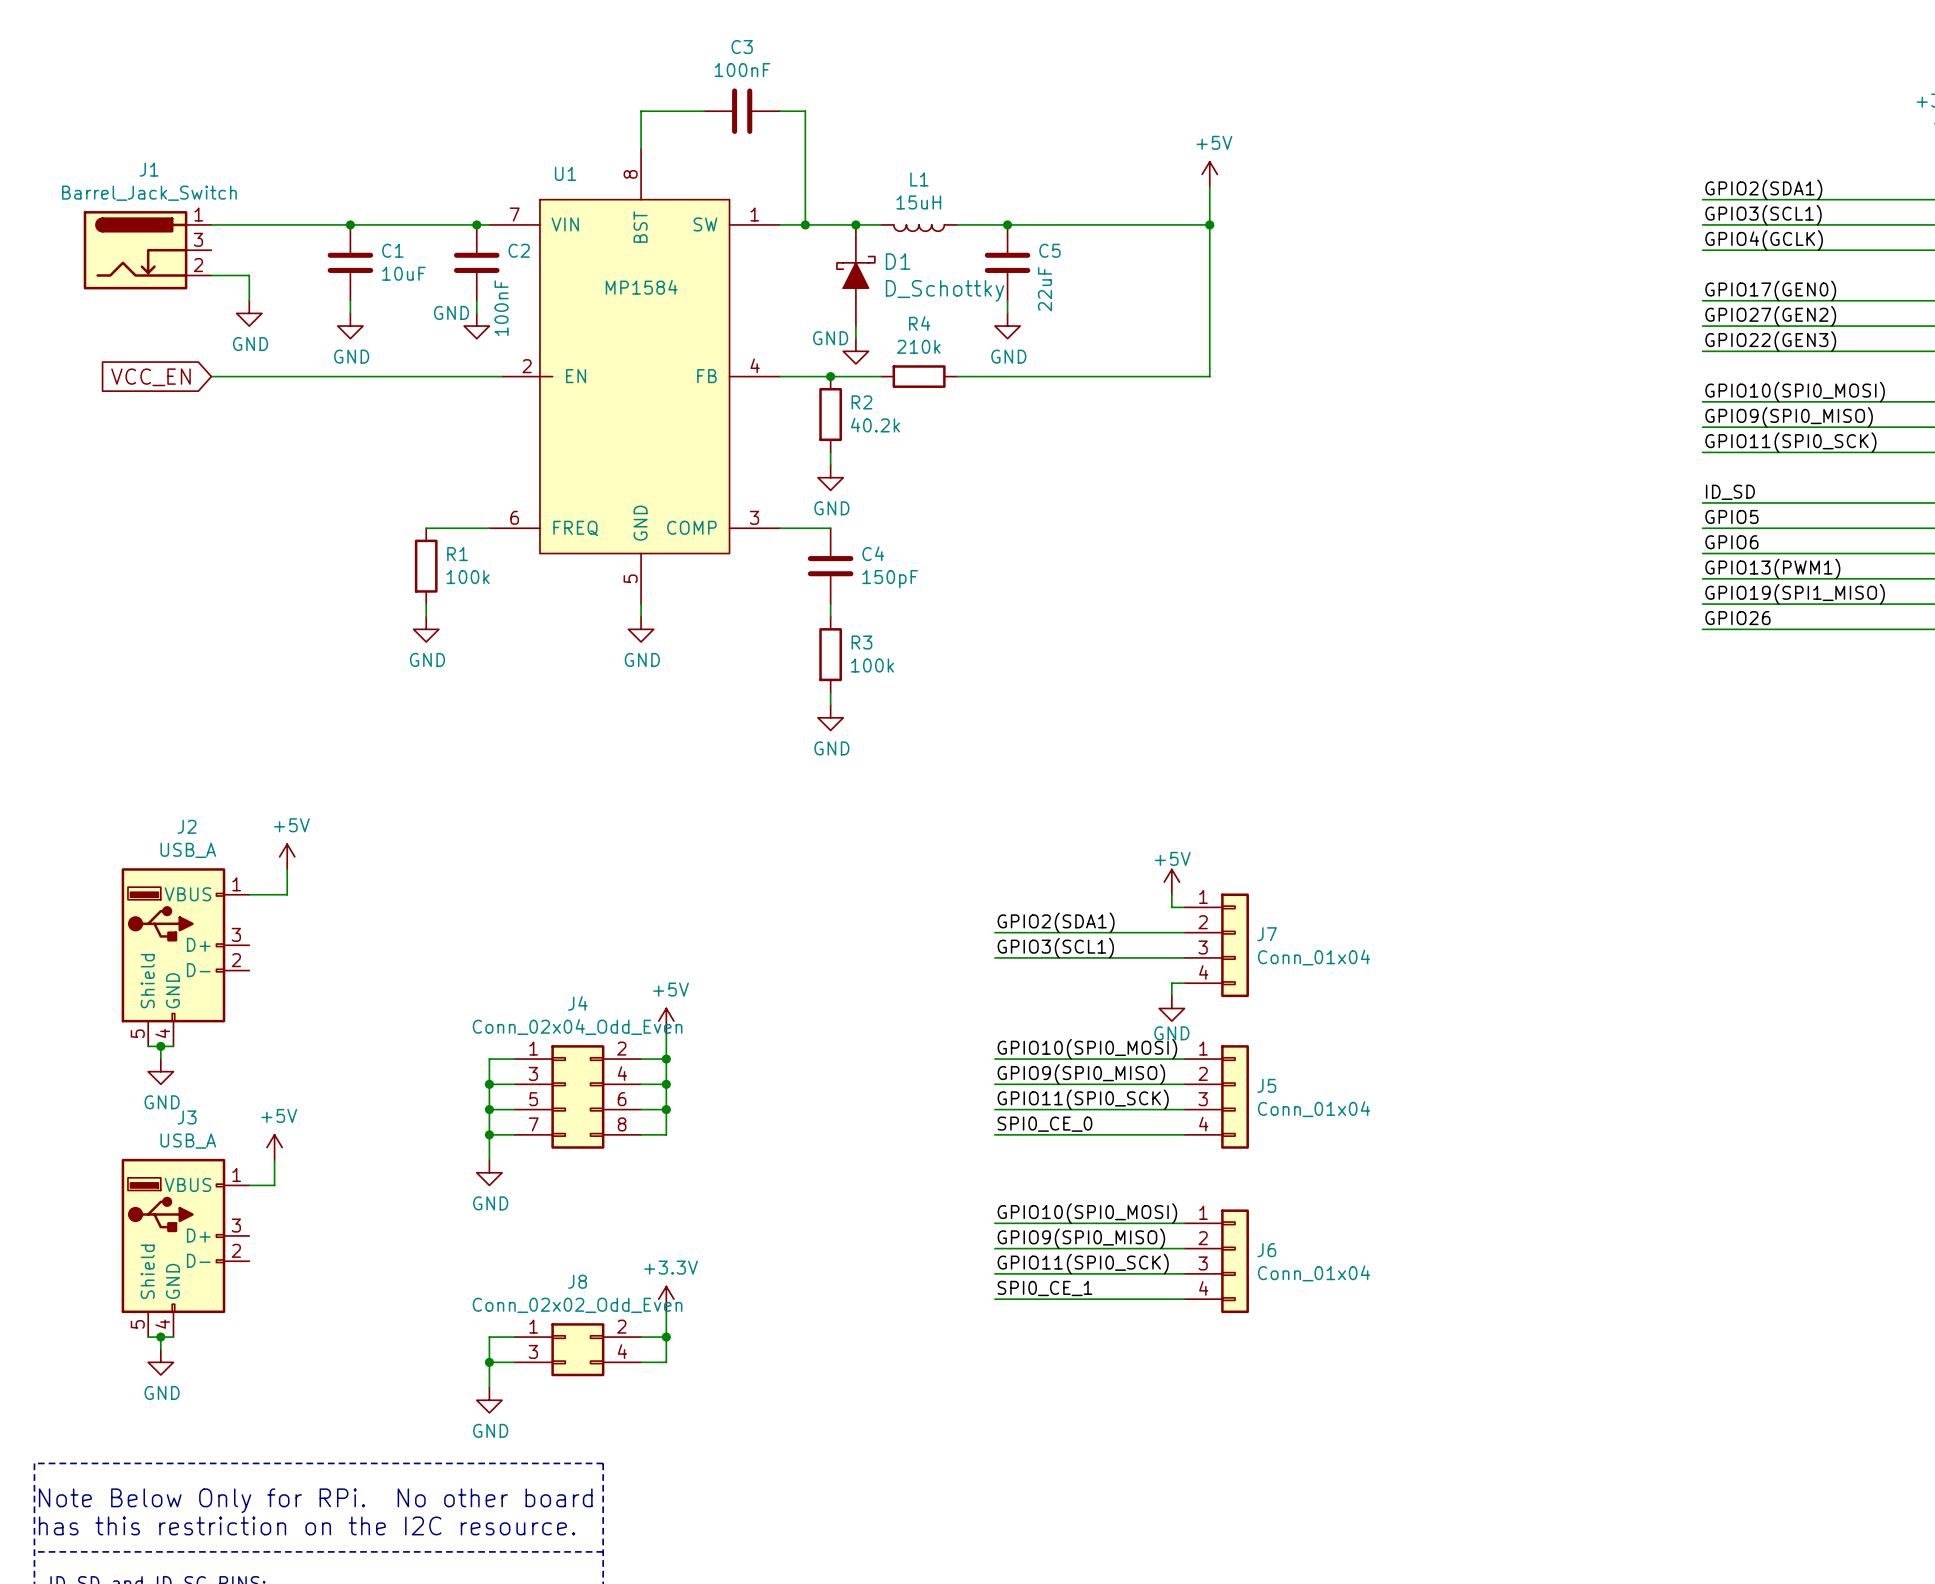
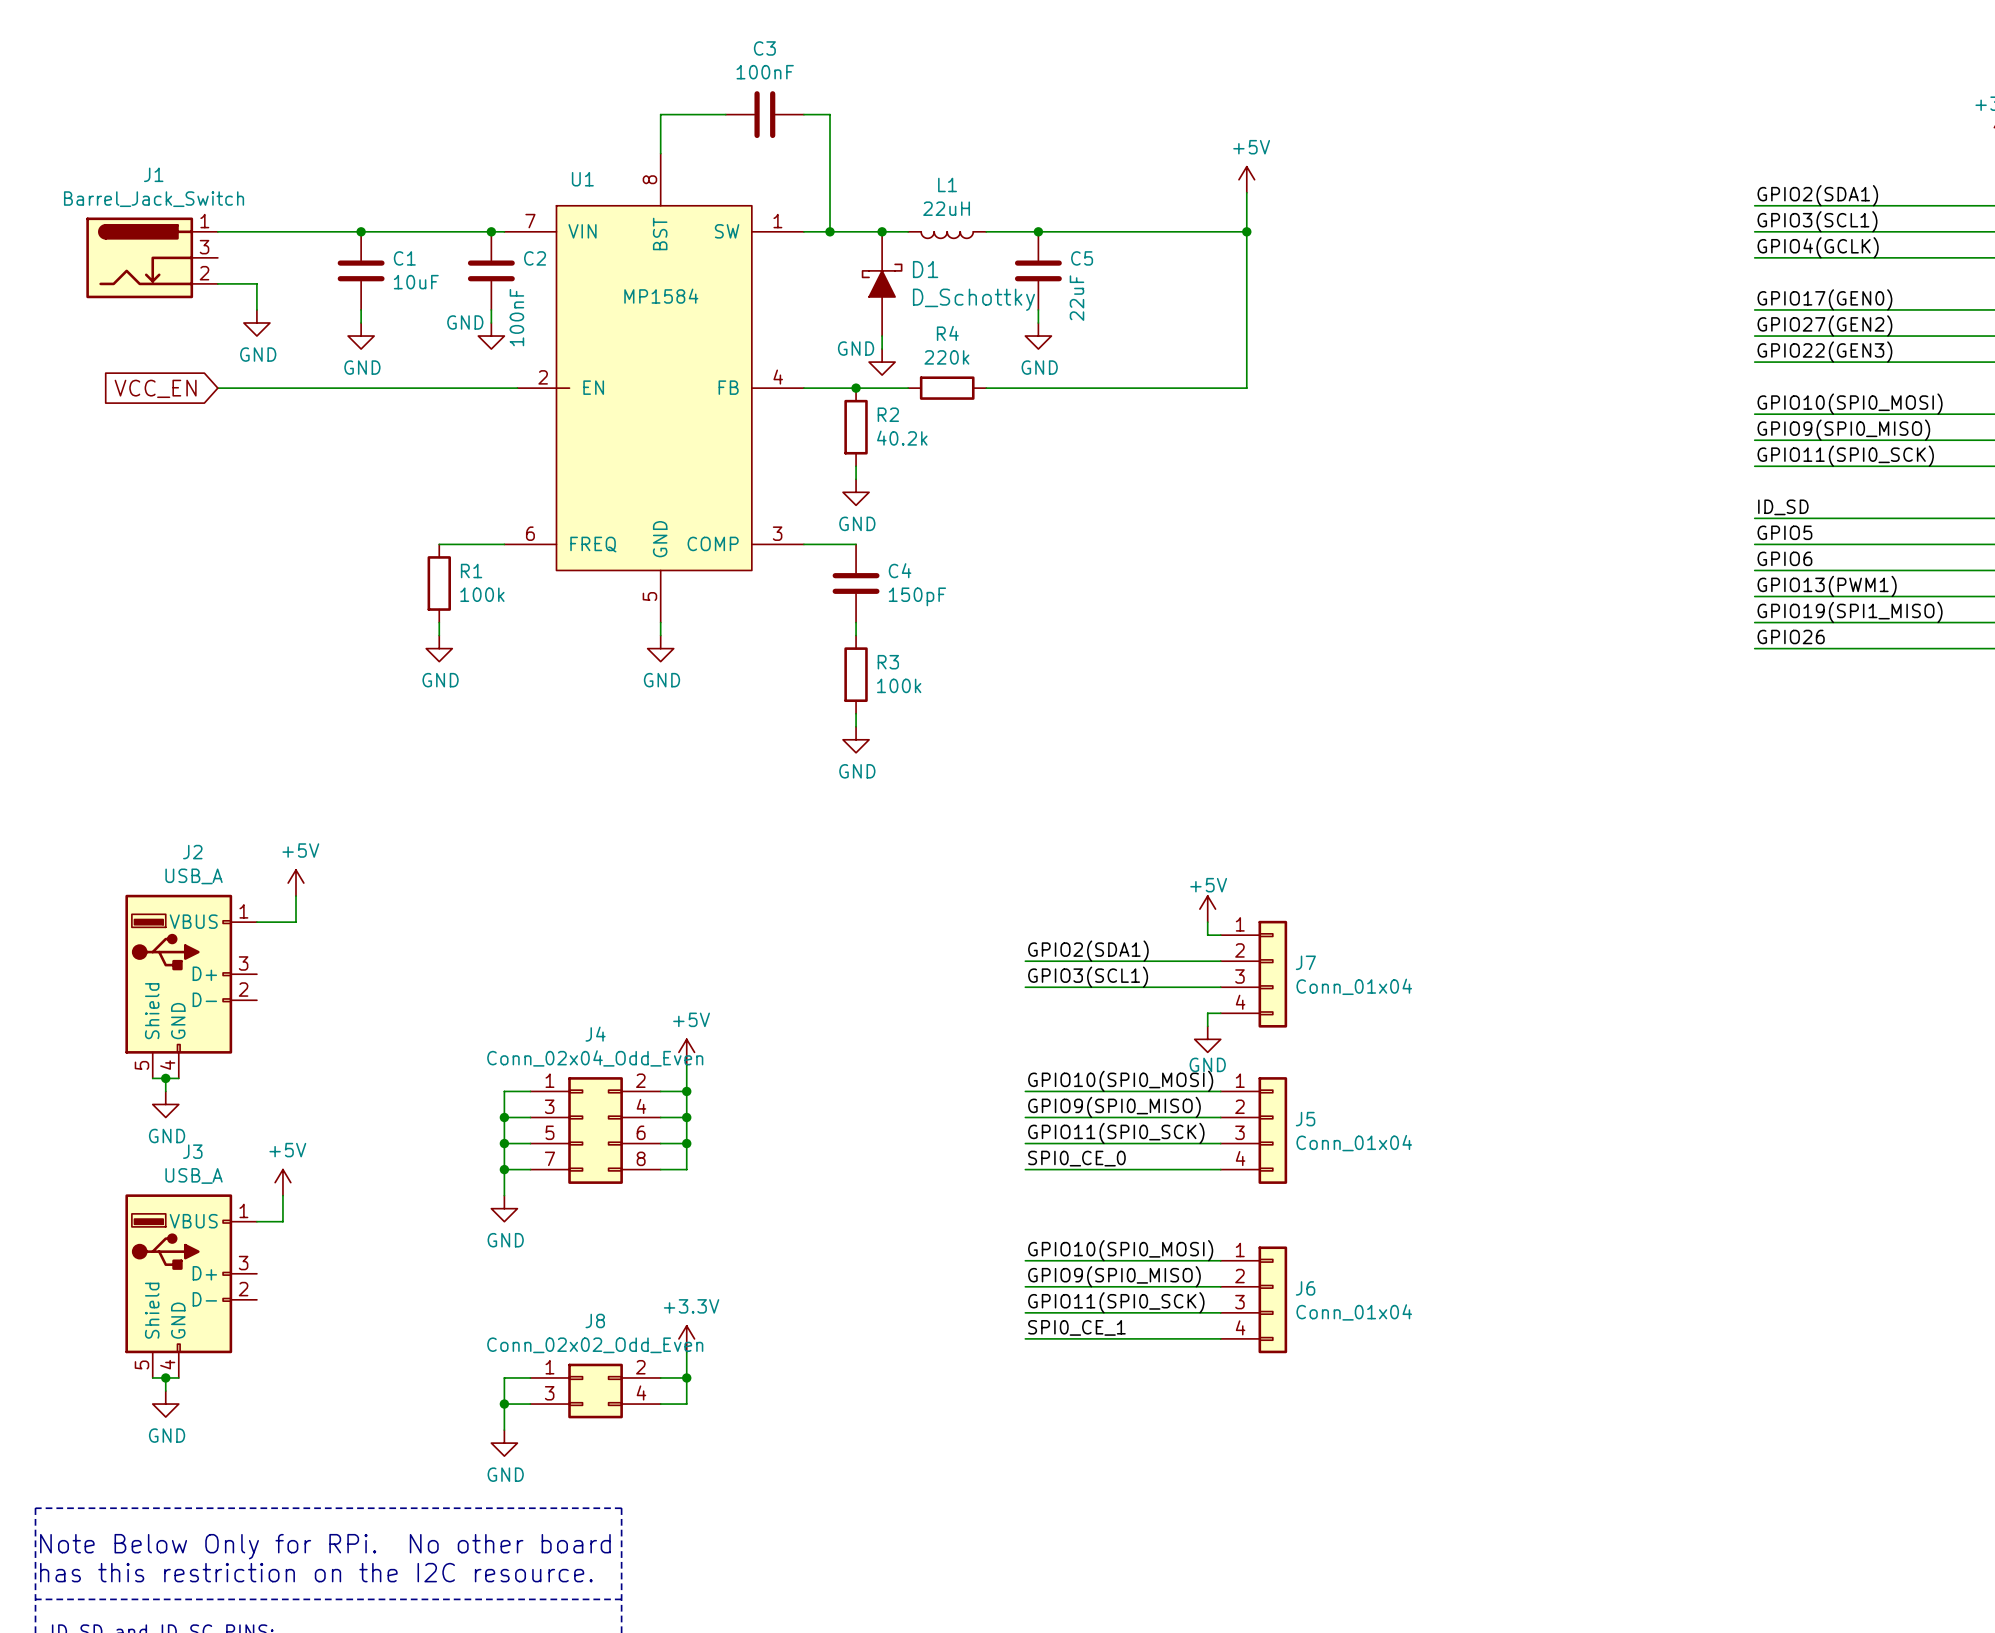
L1 value: 15uH (918, 202) -> 22uH (946, 208)
R4 value: 210k (918, 346) -> 220k (946, 357)

